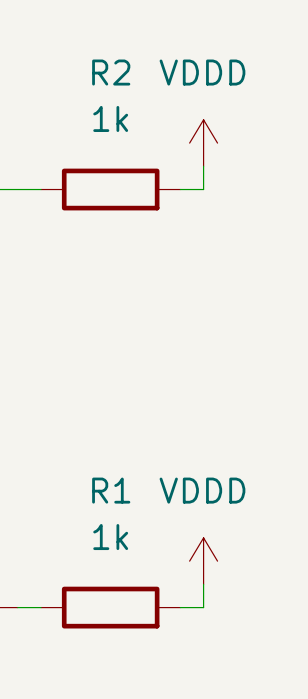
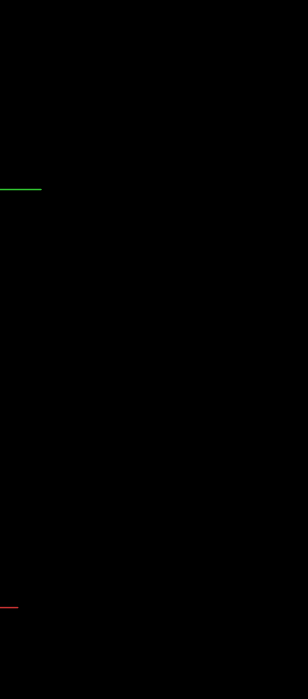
power symbol: VDDD (203, 143) -> none
wire: (203, 166) (203, 189) (180, 189) -> none
R2: 1k (110, 189) -> none
power symbol: VDDD (203, 561) -> none
wire: (203, 584) (203, 607) (180, 607) -> none
wire: (17, 607) (41, 607) -> none
R1: 1k (110, 607) -> none

